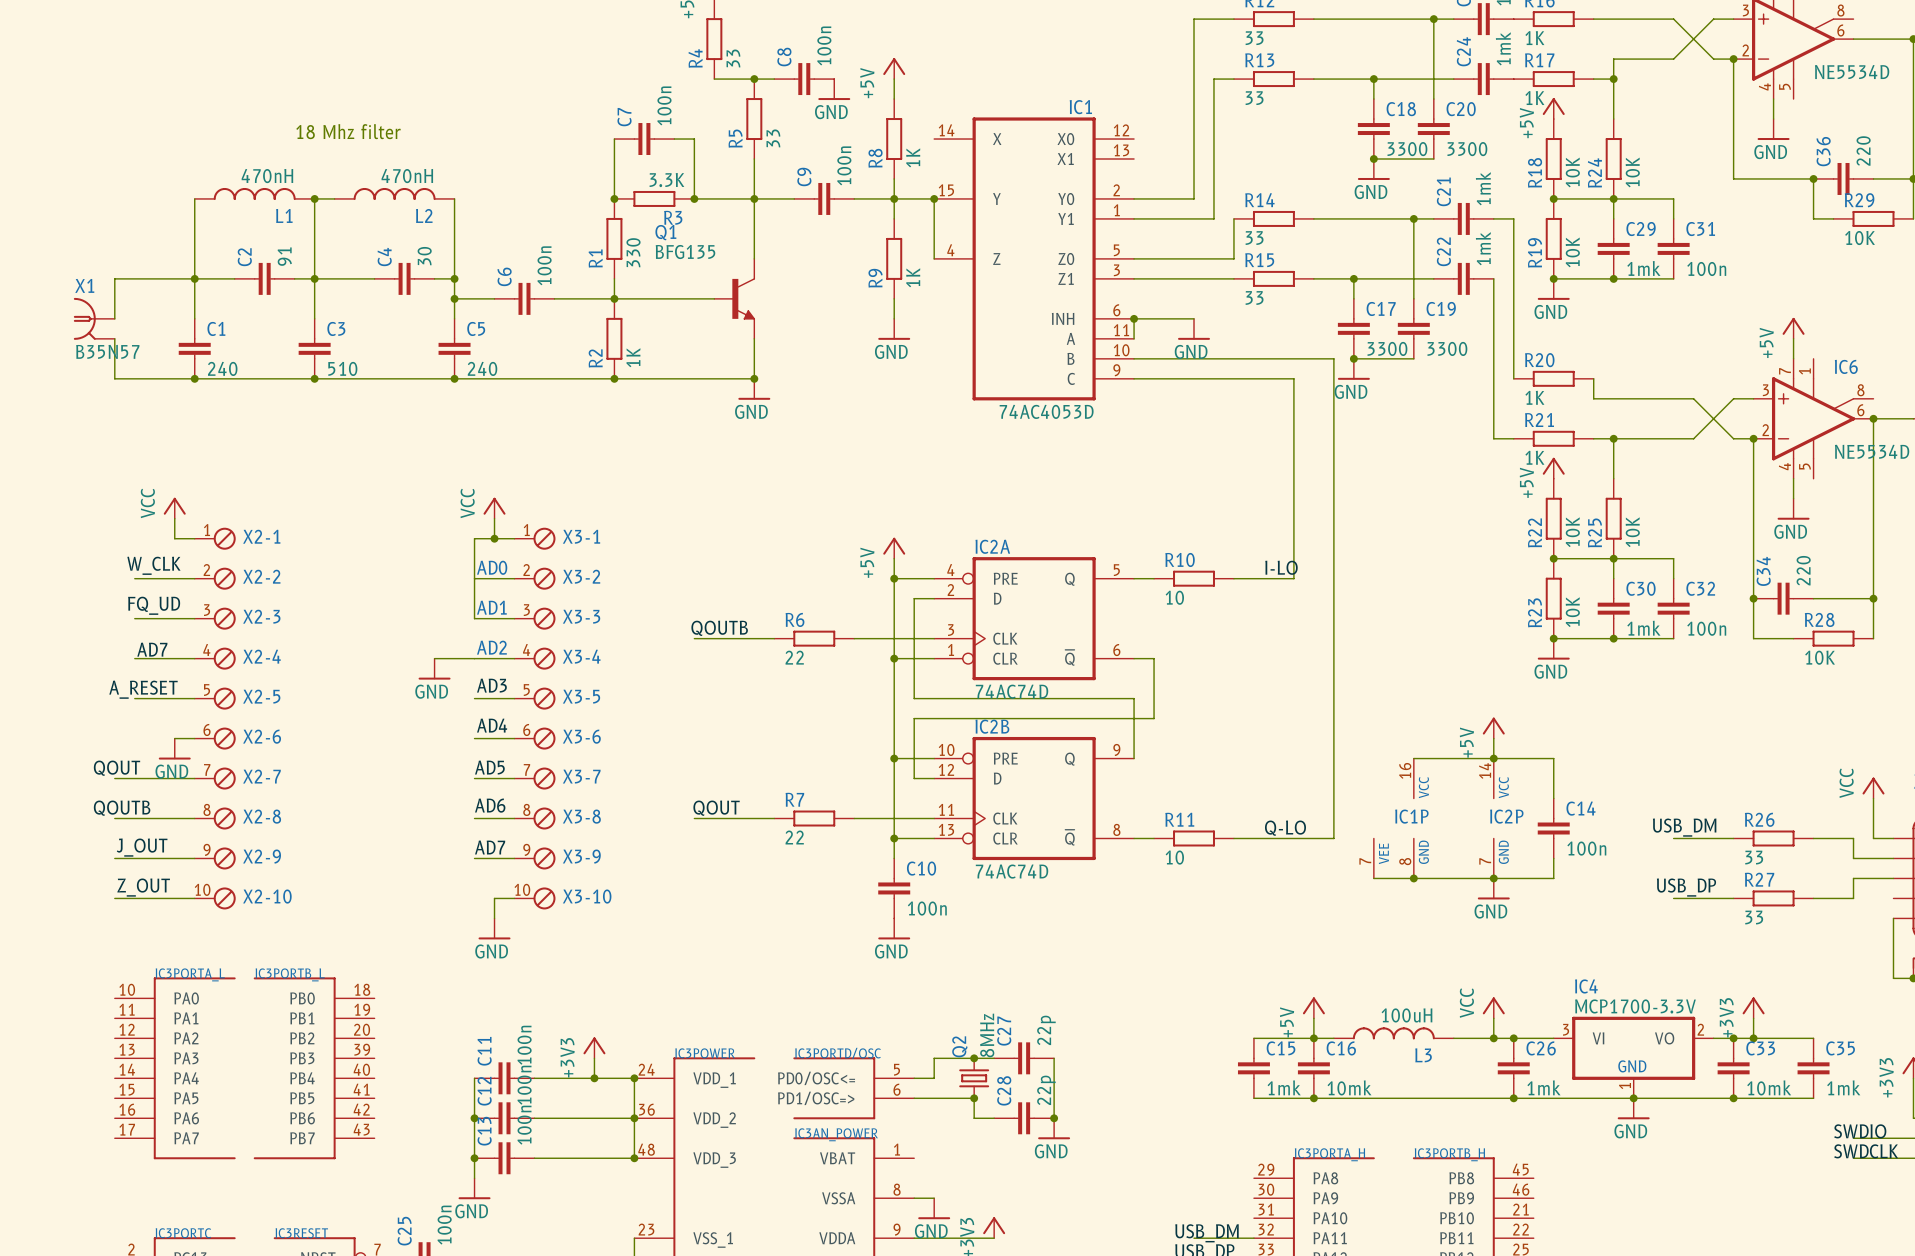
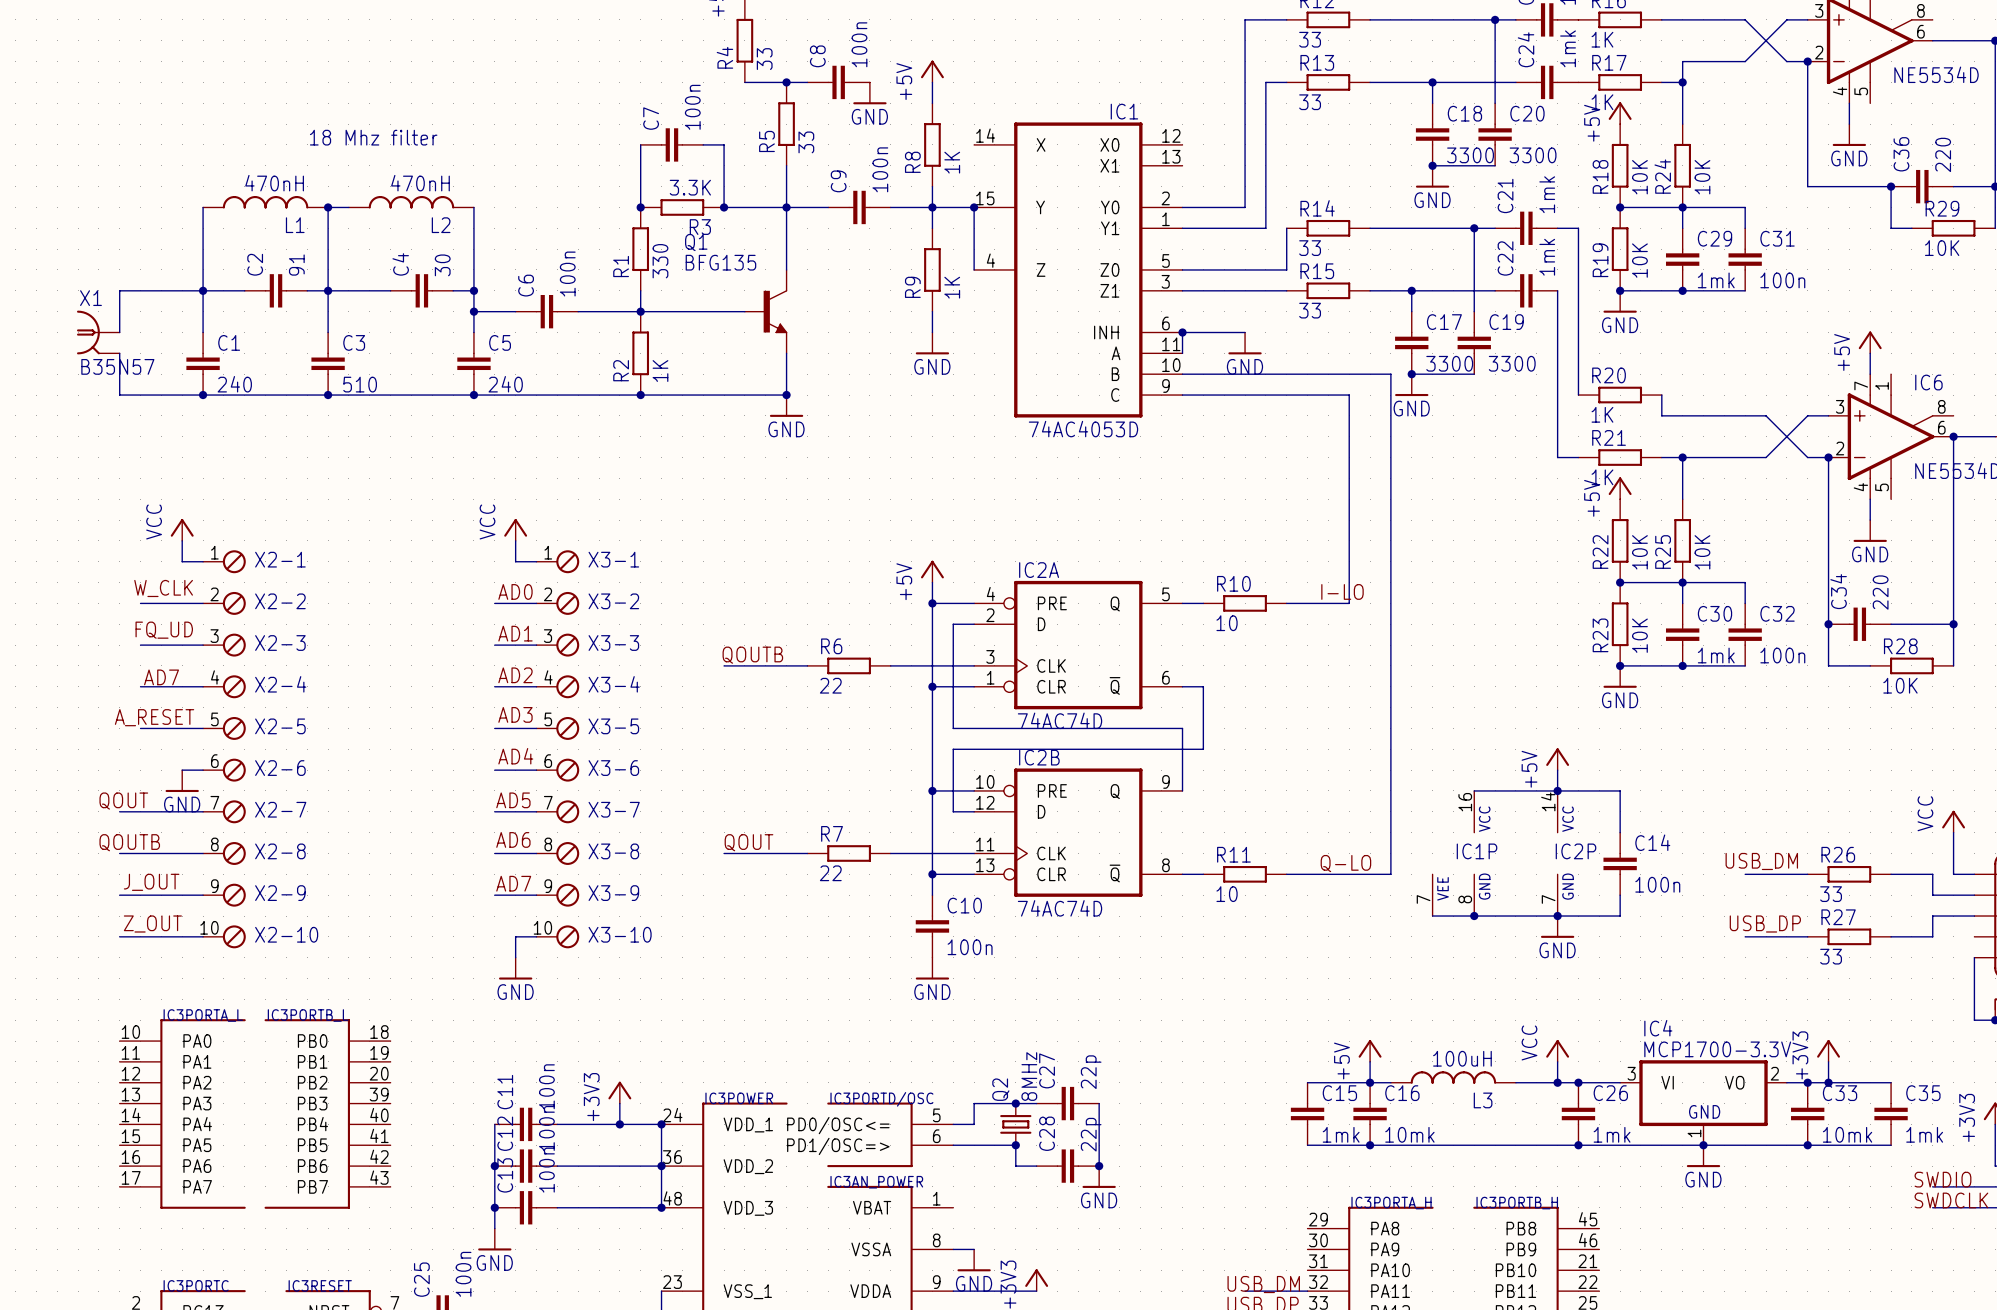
wire: (494, 538) (474, 538) (474, 618) -> none
junction: (494, 538) -> none
text: AD0 (492, 567) -> none
label: none -> AD0 (515, 591)
text: AD1 (491, 607) -> none
label: none -> AD1 (515, 633)
text: AD2 (491, 647) -> none
label: none -> AD2 (515, 675)
wire: (434, 658) (474, 658) -> none
power symbol: GND (434, 669) -> none

